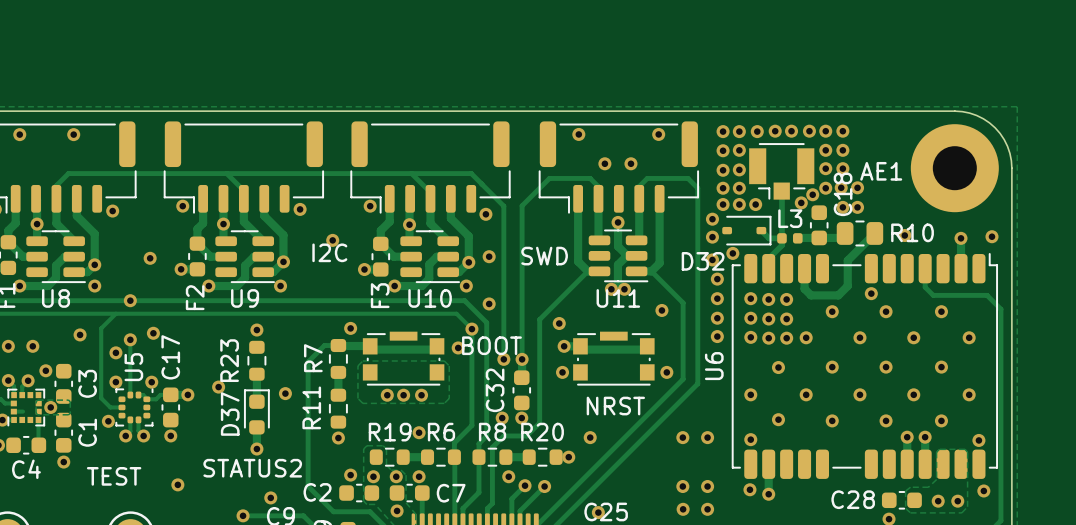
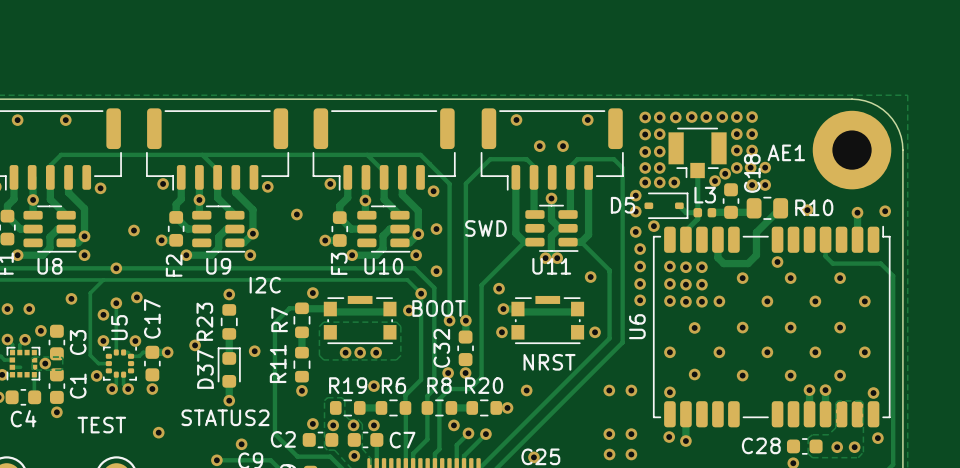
text position: I2C (329, 252) -> I2C (265, 285)
D32 name: D32 (703, 261) -> D5 (623, 205)

